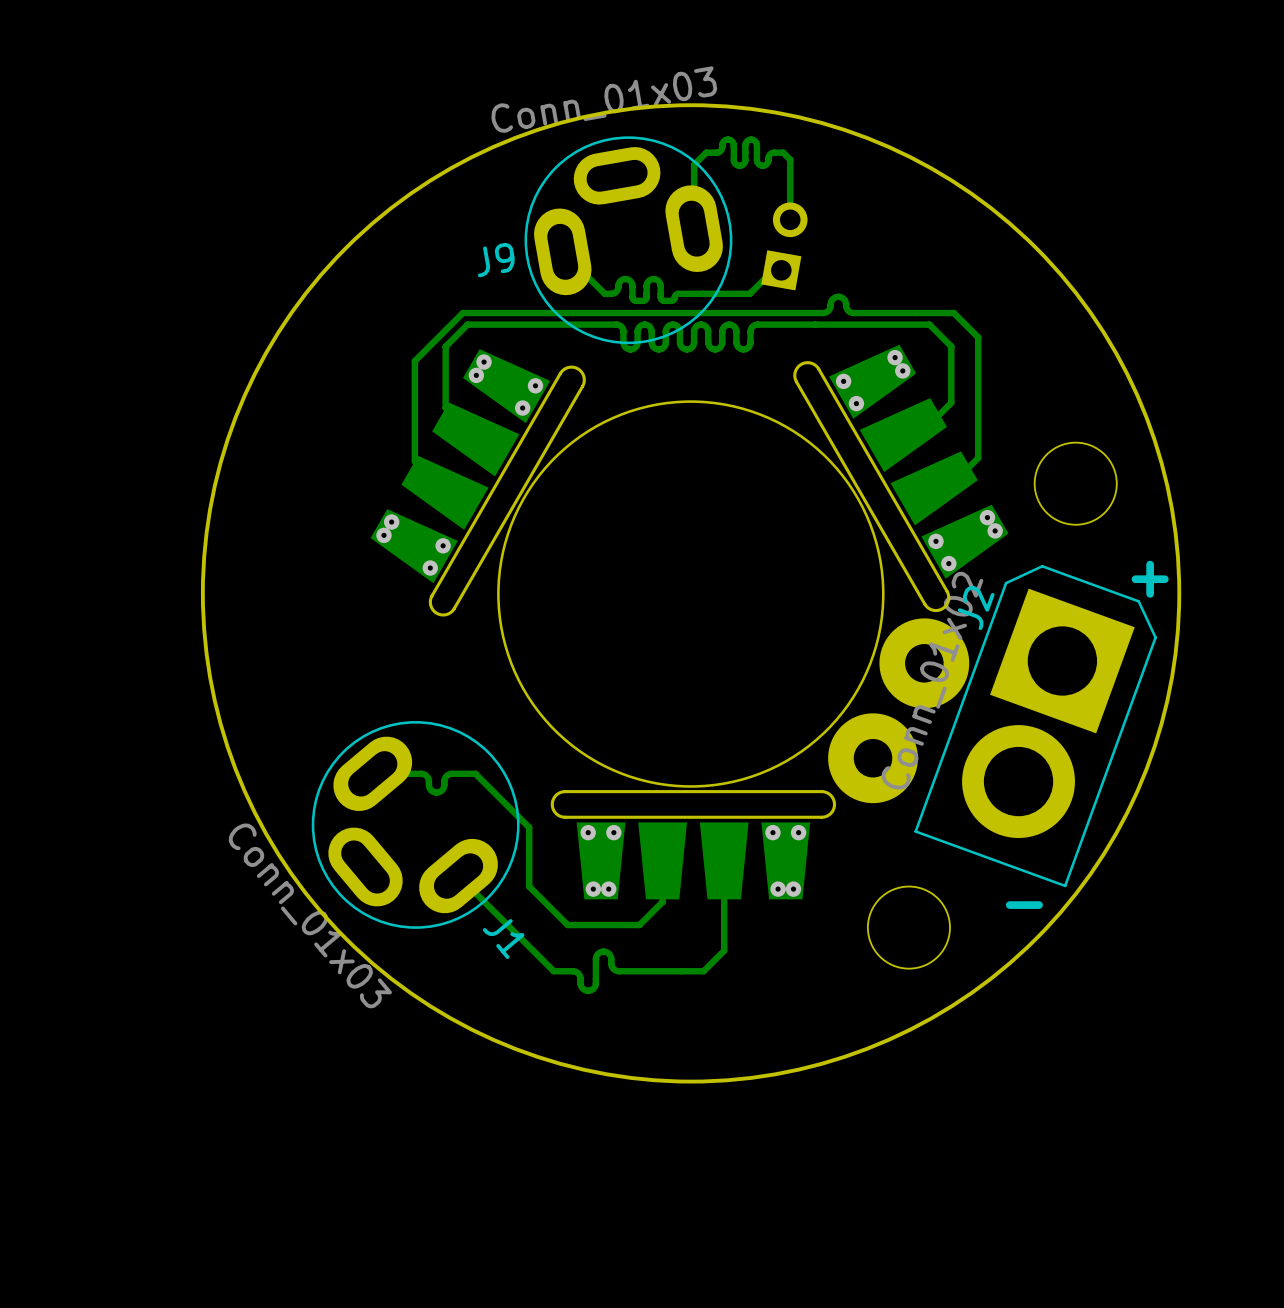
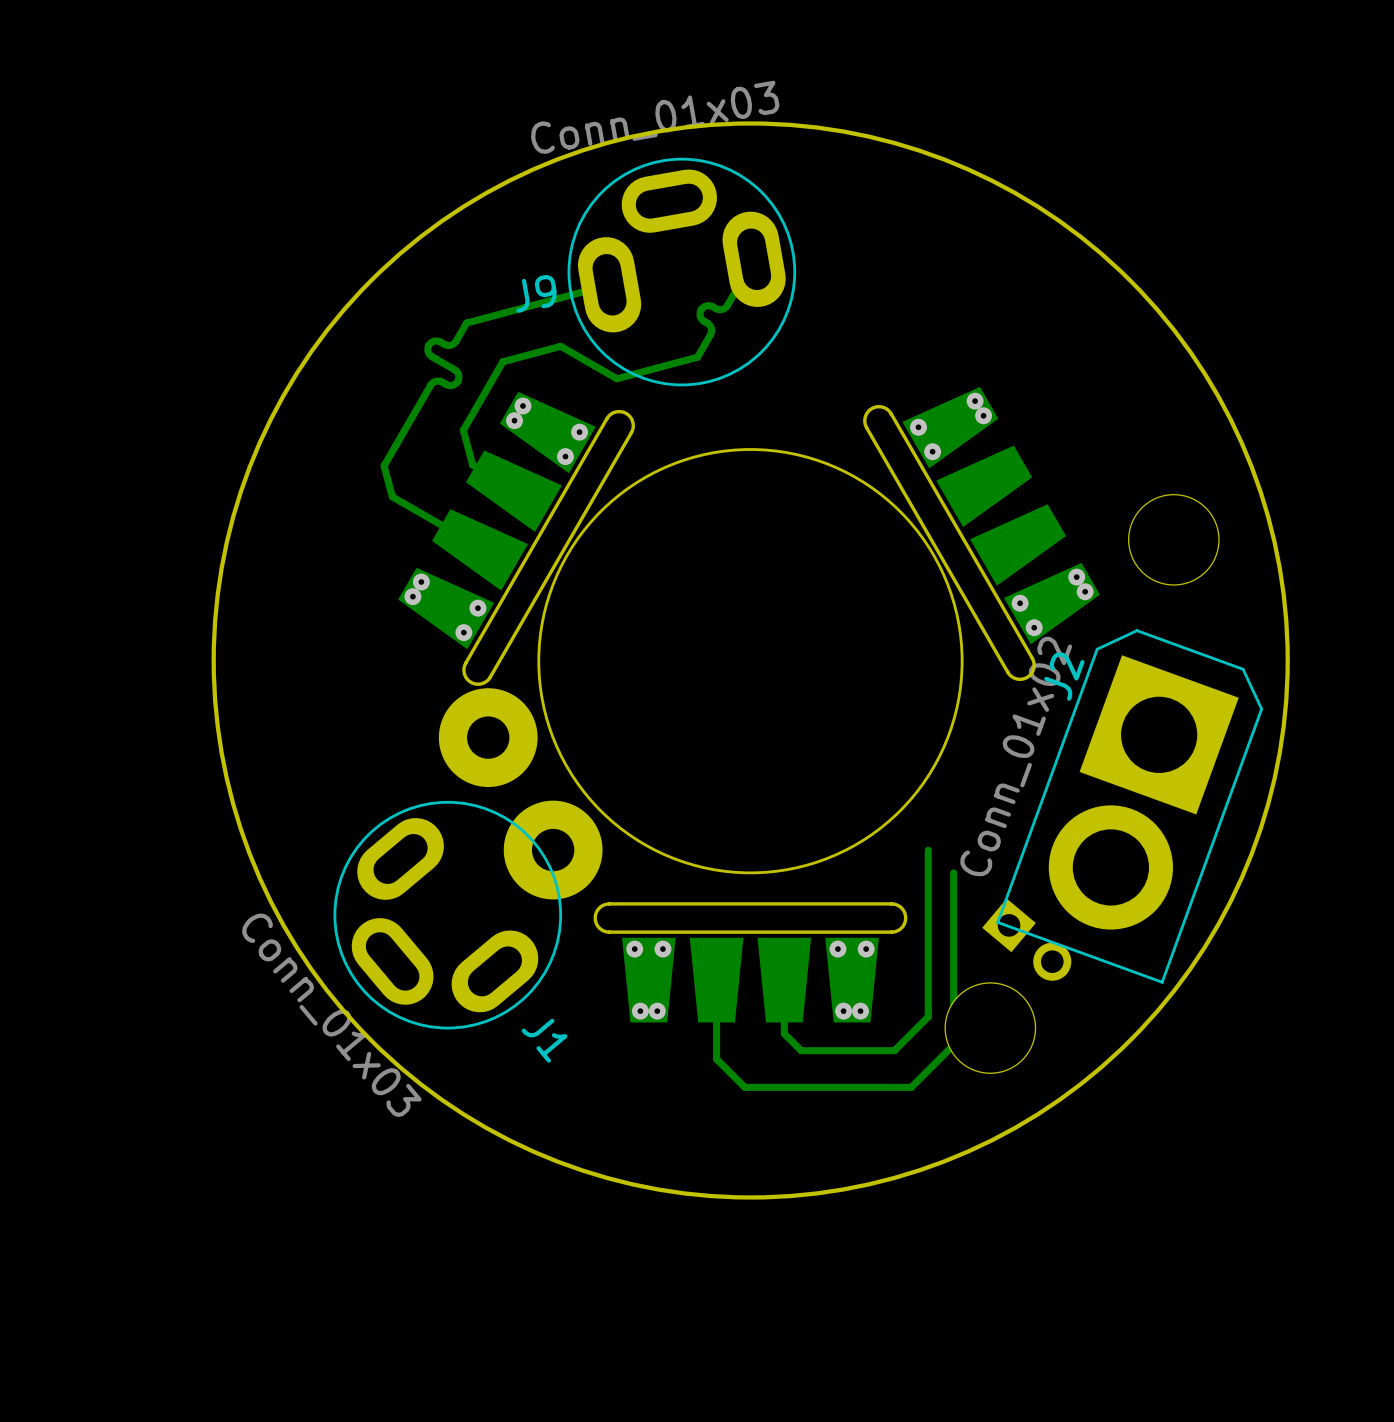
bottom track: (790, 219) (790, 159) (783, 152) (772, 152) (769, 155) (766, 164) (760, 165) (756, 160) (756, 143) (750, 139) (745, 143) (744, 162) (737, 165) (733, 161) (733, 143) (727, 139) (723, 142) (720, 151) (706, 152) (694, 164) (694, 228) -> none
part: (784, 246) -> none
bottom track: (562, 251) (604, 293) (615, 292) (621, 280) (629, 280) (632, 285) (632, 298) (635, 300) (645, 299) (646, 284) (651, 279) (656, 279) (660, 283) (661, 299) (671, 300) (677, 293) (749, 293) (773, 270) (781, 270) -> (609, 284) (466, 323) (452, 344) (446, 345) (436, 340) (428, 345) (429, 354) (456, 370) (458, 374) (458, 380) (451, 385) (438, 381) (431, 383) (384, 465) (392, 496) (477, 546)
bottom track: (694, 342) (690, 348) (682, 347) (679, 343) (679, 328) (673, 324) (666, 328) (665, 345) (658, 349) (652, 345) (650, 327) (645, 324) (641, 325) (637, 329) (637, 345) (630, 349) (624, 345) (623, 329) (617, 324) (467, 324) (445, 346) (445, 407) (473, 436) -> (754, 259) (726, 307) (719, 309) (707, 305) (701, 309) (700, 317) (709, 325) (711, 331) (697, 357) (616, 378) (560, 346) (502, 361) (463, 430) (472, 464) (511, 487)
bottom track: (694, 342) (694, 328) (700, 324) (707, 328) (708, 345) (715, 349) (721, 345) (723, 327) (728, 324) (732, 325) (736, 329) (736, 345) (743, 349) (749, 345) (750, 329) (756, 324) (929, 324) (951, 346) (951, 402) (922, 431) -> none
bottom track: (951, 485) (978, 458) (978, 337) (953, 313) (852, 312) (847, 309) (843, 299) (838, 296) (832, 299) (829, 310) (822, 313) (462, 313) (414, 361) (414, 461) (443, 489) -> none
text: + (1150, 579) -> none
part: none -> (488, 737)
part: (924, 663) -> none
part: (873, 758) -> none
part: none -> (553, 850)
bottom track: none -> (928, 850) (928, 1016) (894, 1050) (801, 1050) (784, 1033) (784, 980)
bottom track: (372, 773) (423, 774) (428, 778) (430, 789) (436, 792) (442, 789) (444, 778) (448, 774) (475, 773) (529, 827) (529, 886) (567, 925) (639, 925) (662, 901) (662, 860) -> none
bottom track: none -> (953, 872) (953, 1045) (911, 1087) (744, 1087) (716, 1059) (716, 980)
via: (588, 832) -> none
via: (613, 832) -> none
via: (772, 832) -> none
via: (798, 832) -> none
part position: (693, 844) -> (750, 962)
part: none -> (1026, 939)
via: none -> (634, 949)
via: none -> (662, 949)
via: none -> (837, 949)
via: none -> (866, 949)
bottom track: (724, 860) (724, 950) (703, 971) (617, 971) (612, 966) (609, 954) (602, 951) (596, 957) (595, 986) (588, 990) (581, 986) (580, 976) (576, 972) (553, 971) (458, 876) -> none
via: (593, 889) -> none
via: (608, 889) -> none
via: (778, 889) -> none
via: (793, 889) -> none
text: - (1024, 905) -> none
via: none -> (640, 1011)
via: none -> (657, 1011)
via: none -> (843, 1011)
via: none -> (860, 1011)

